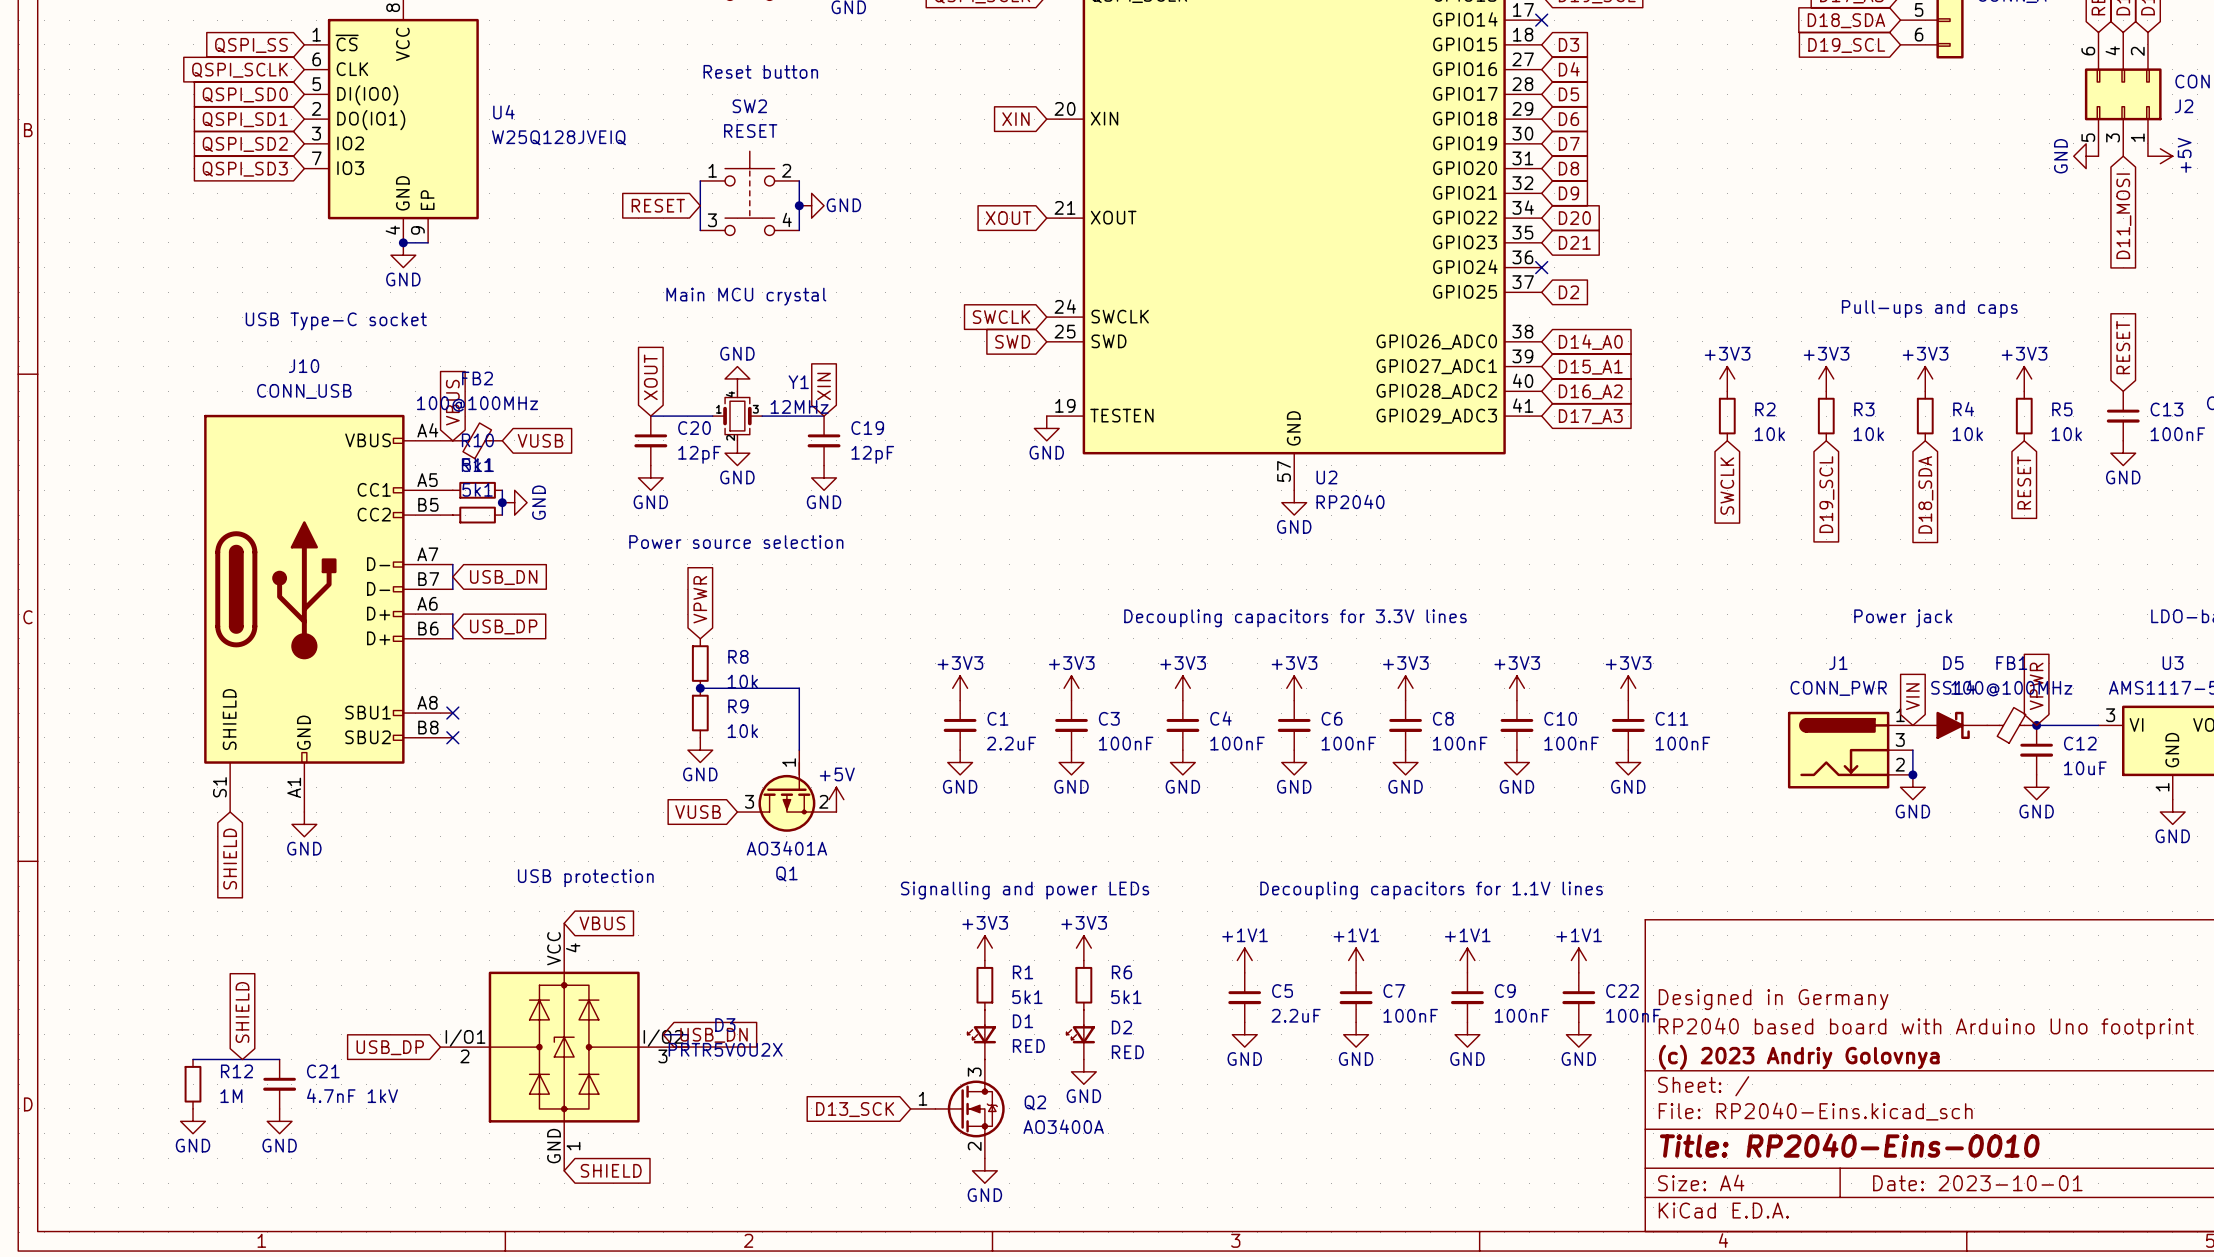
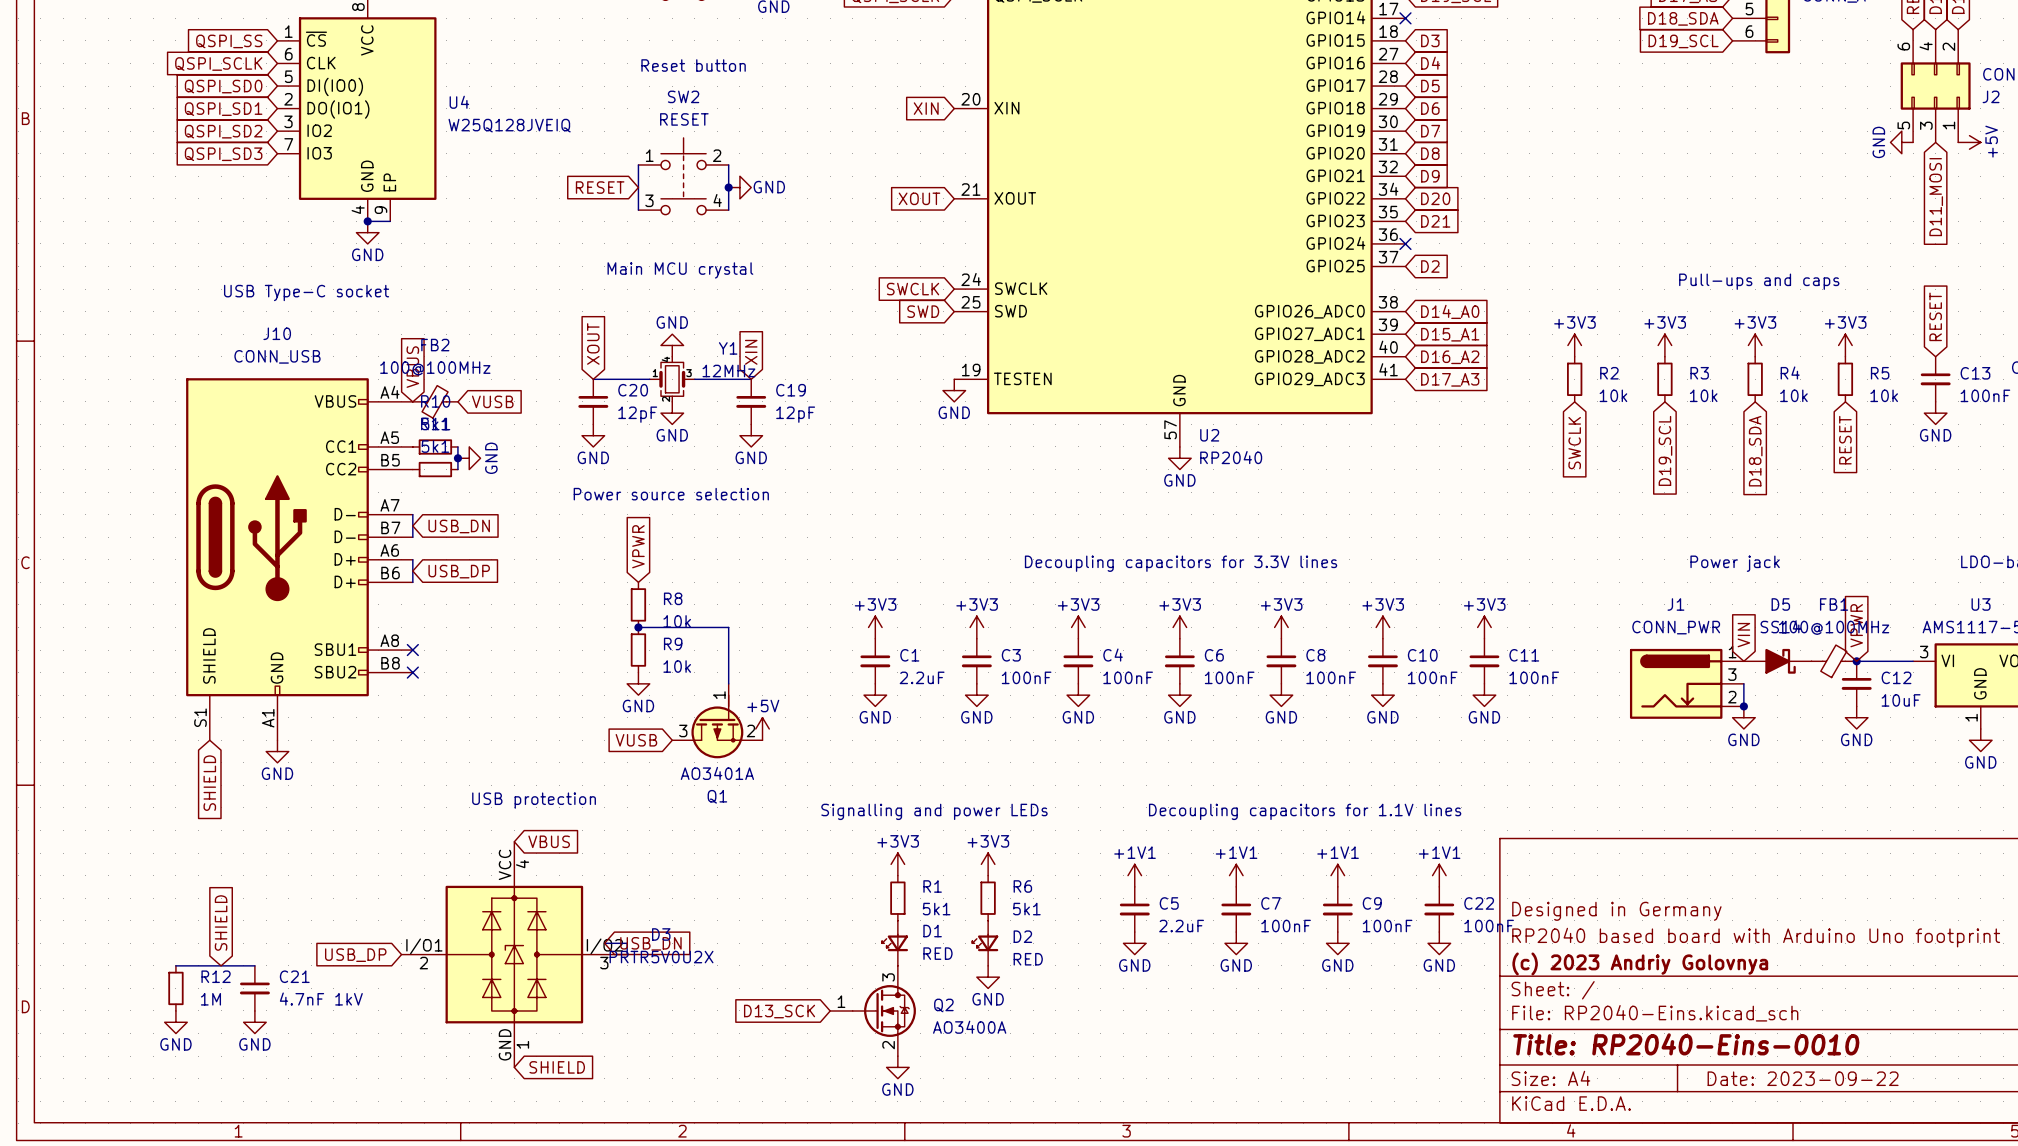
title block: Date: 2023-10-01 (1977, 1183) -> Date: 2023-09-22 (1803, 1078)

